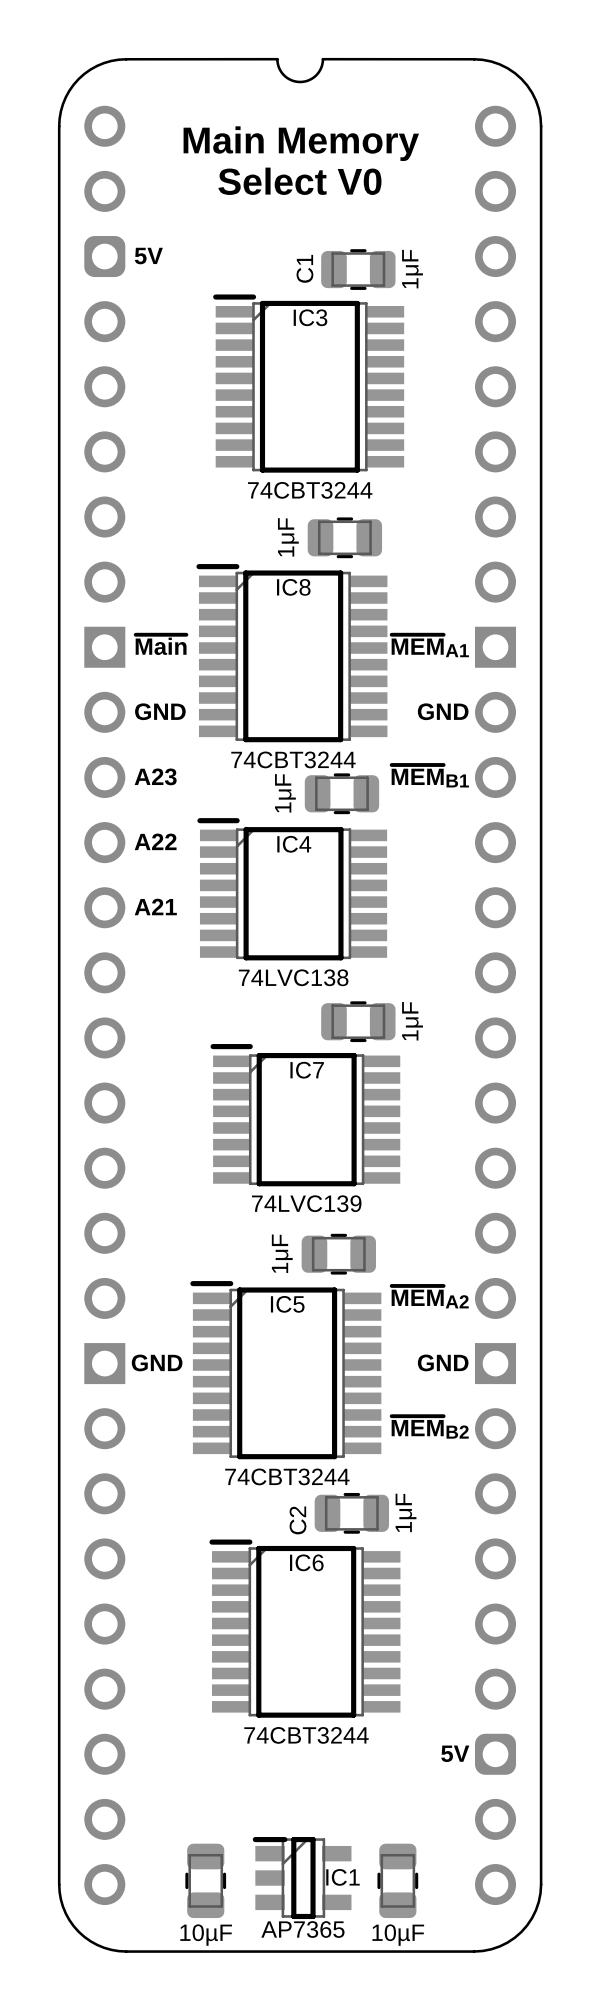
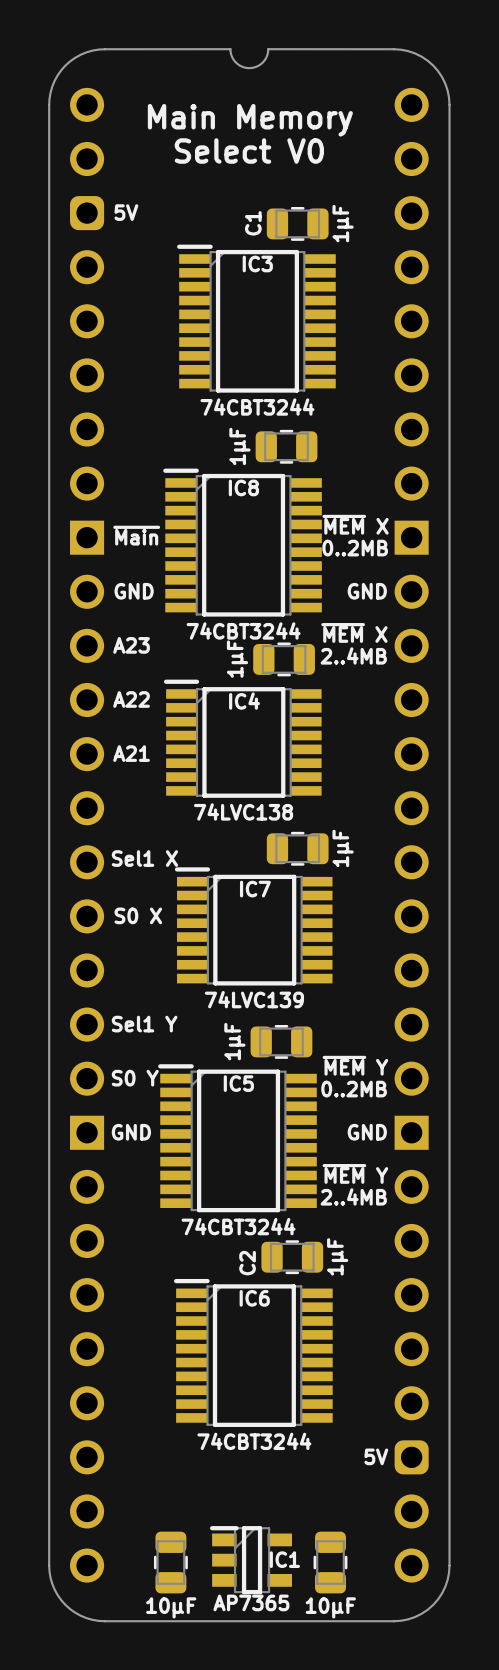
text: ~{MEM}A1 (430, 645) -> ~{MEM} X (355, 524)
text: none -> 0..2MB (355, 548)
text: ~{MEM}B1 (430, 776) -> ~{MEM} X (354, 632)
text: none -> 2..4MB (353, 655)
text: none -> Sel1 X (144, 858)
text: none -> S0 X (138, 915)
text: none -> Sel1 Y (144, 1024)
text: none -> S0 Y (135, 1078)
text: ~{MEM}A2 (430, 1297) -> ~{MEM} Y (355, 1065)
text: none -> 0..2MB (354, 1089)
text: ~{MEM}B2 (430, 1427) -> ~{MEM} Y (355, 1173)
text: none -> 2..4MB (353, 1196)

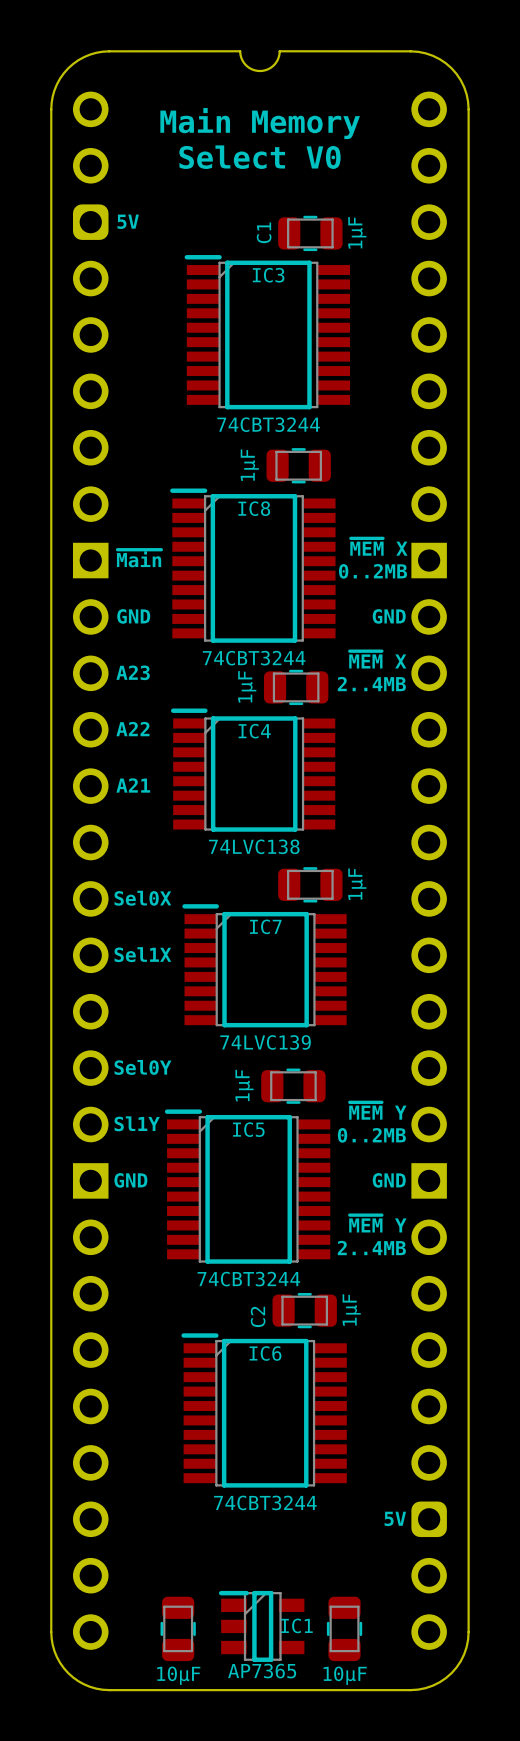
text: Sel1 X (144, 858) -> Sel0X (142, 898)
text: S0 X (138, 915) -> Sel1X (142, 954)
text: Sel1 Y (144, 1024) -> Sel0Y (142, 1067)
text: S0 Y (135, 1078) -> Sl1Y (137, 1123)

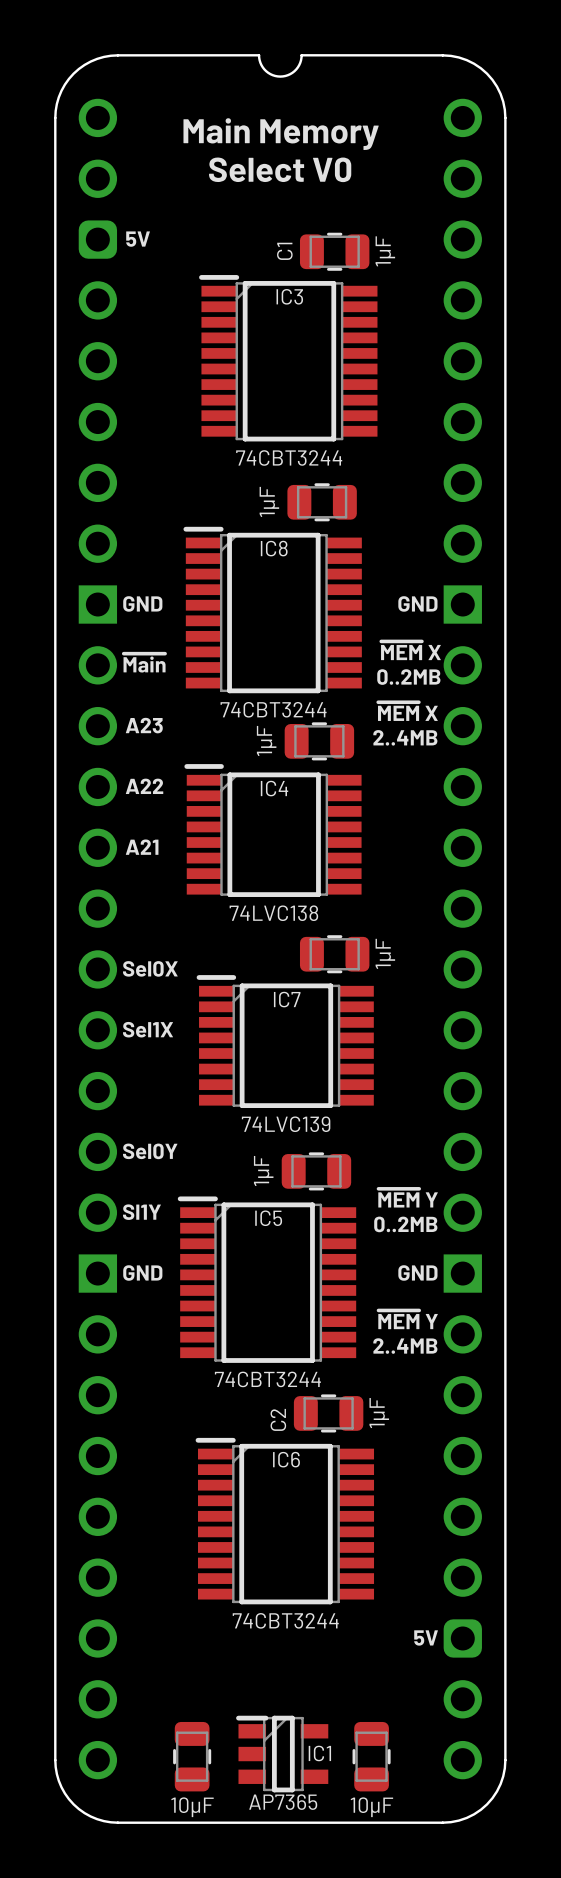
text position: ~{MEM} X (378, 547) -> ~{MEM} X (410, 650)
text position: ~{Main} (139, 558) -> ~{Main} (144, 663)
text position: 0..2MB (373, 571) -> 0..2MB (408, 677)
text position: GND (133, 616) -> GND (142, 603)
text position: GND (389, 616) -> GND (417, 603)

